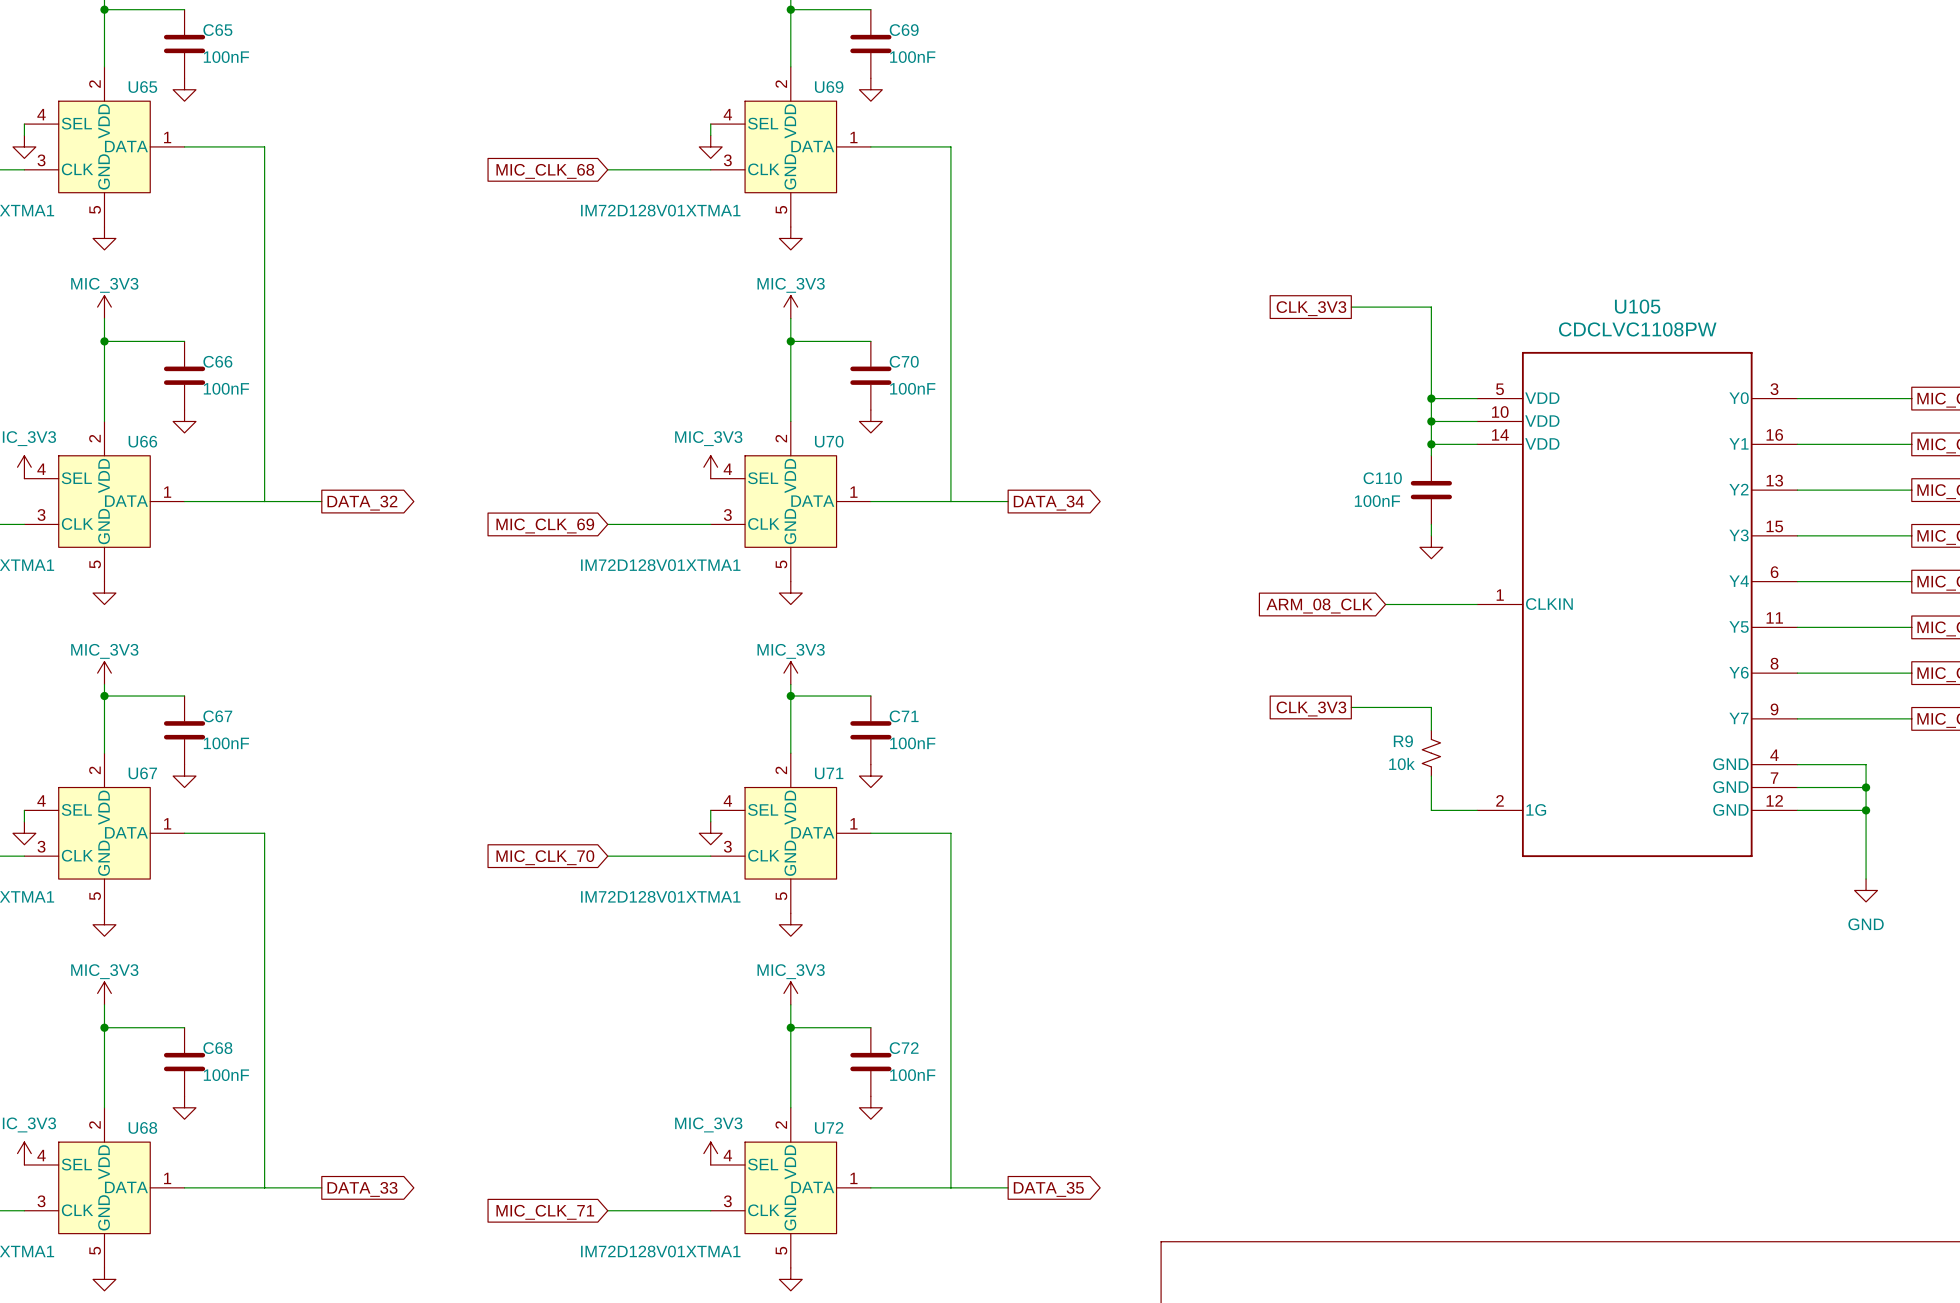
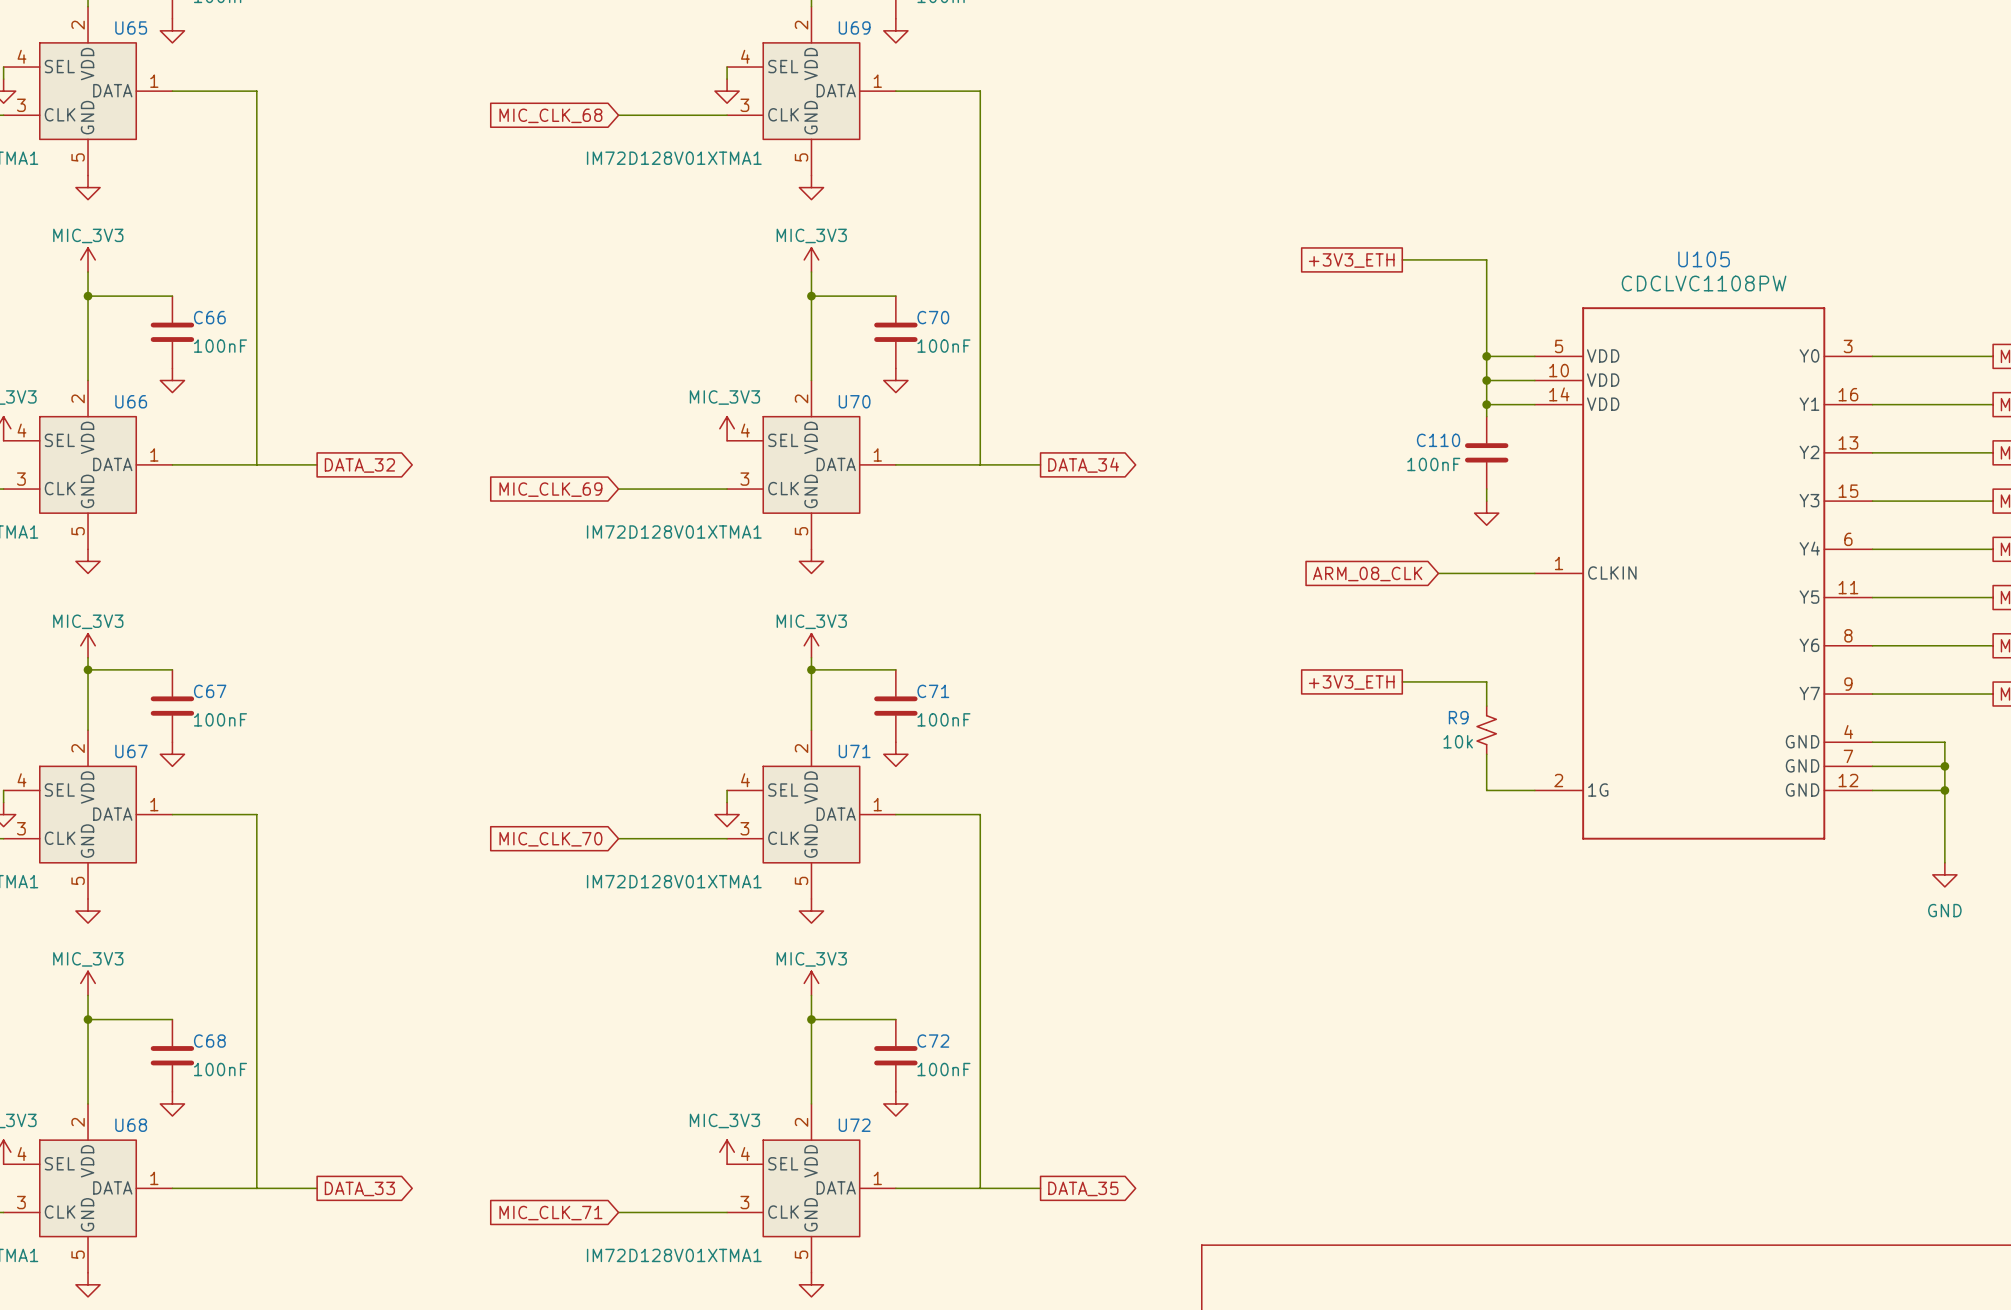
global label: CLK_3V3 (1311, 308) -> +3V3_ETH (1351, 260)
global label: CLK_3V3 (1311, 709) -> +3V3_ETH (1351, 682)

